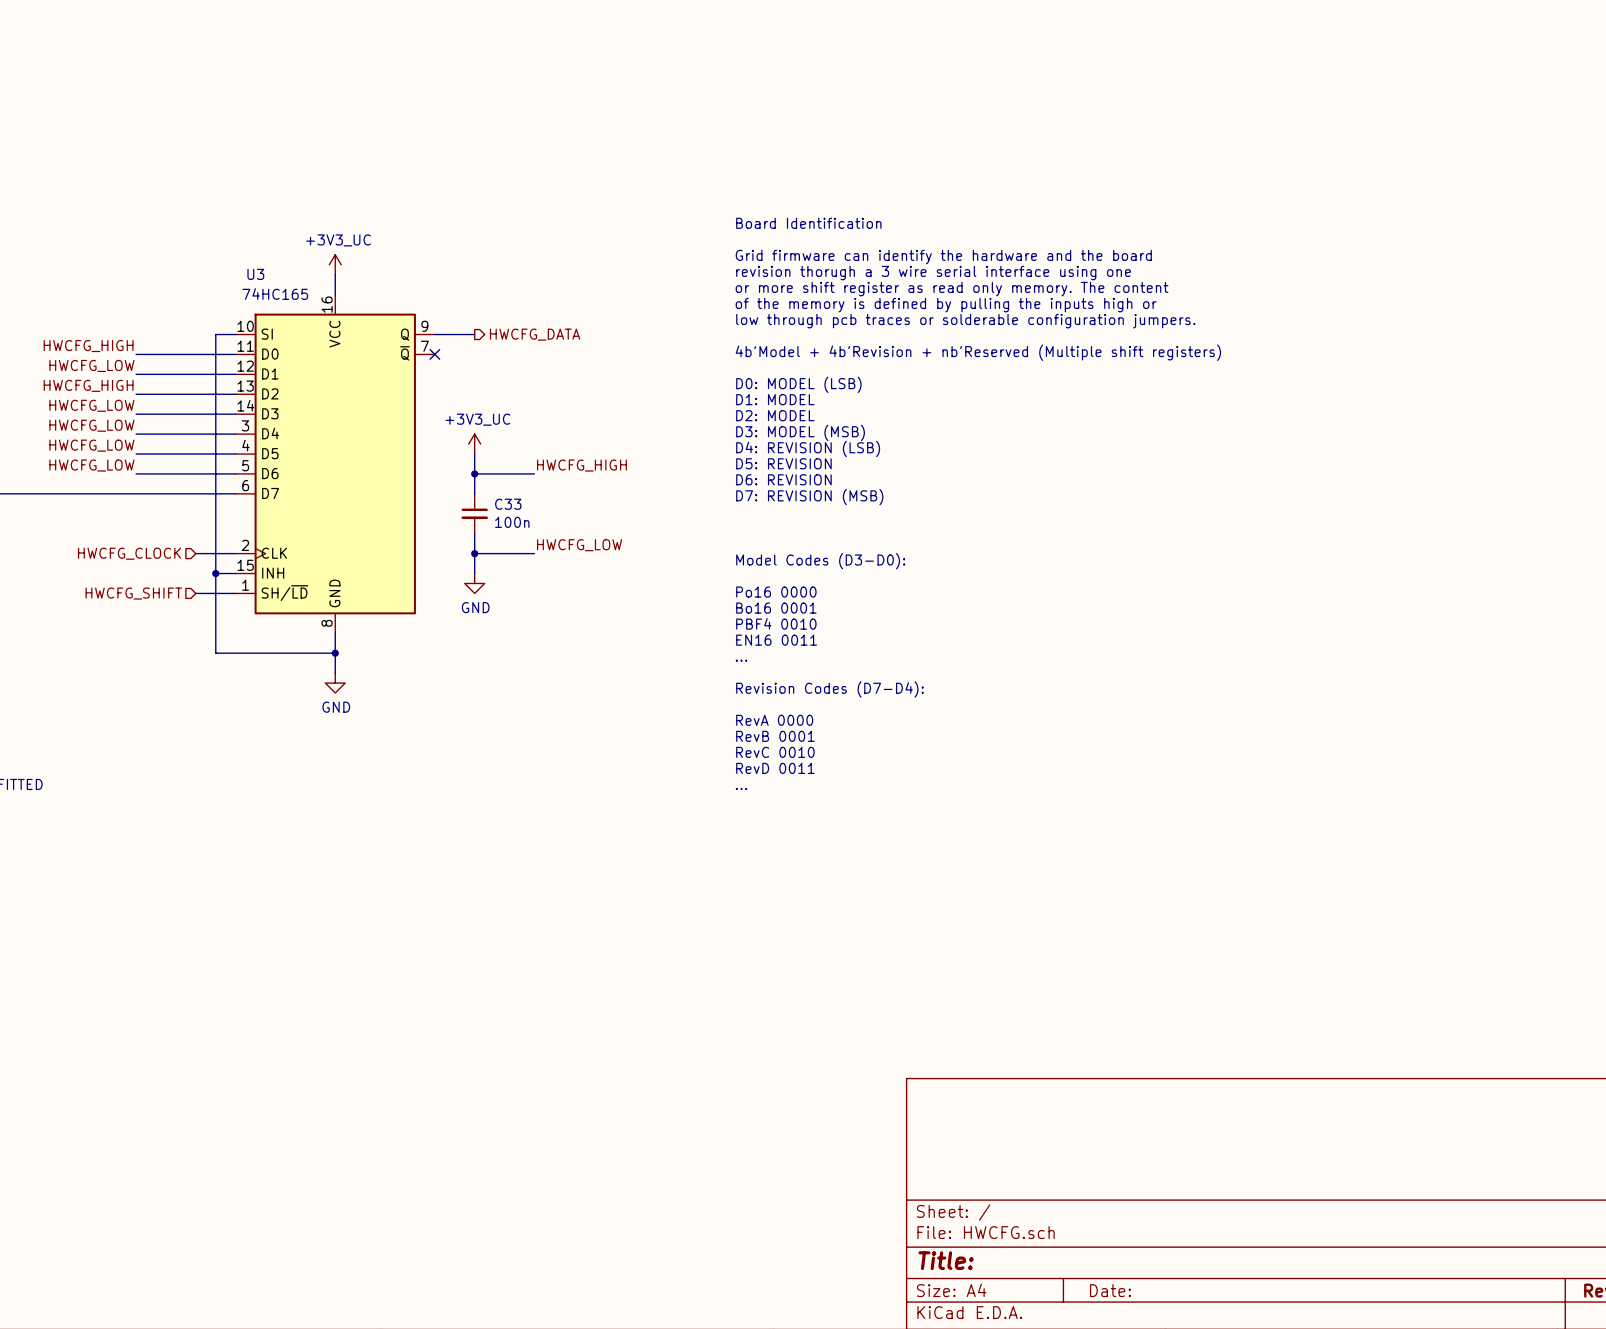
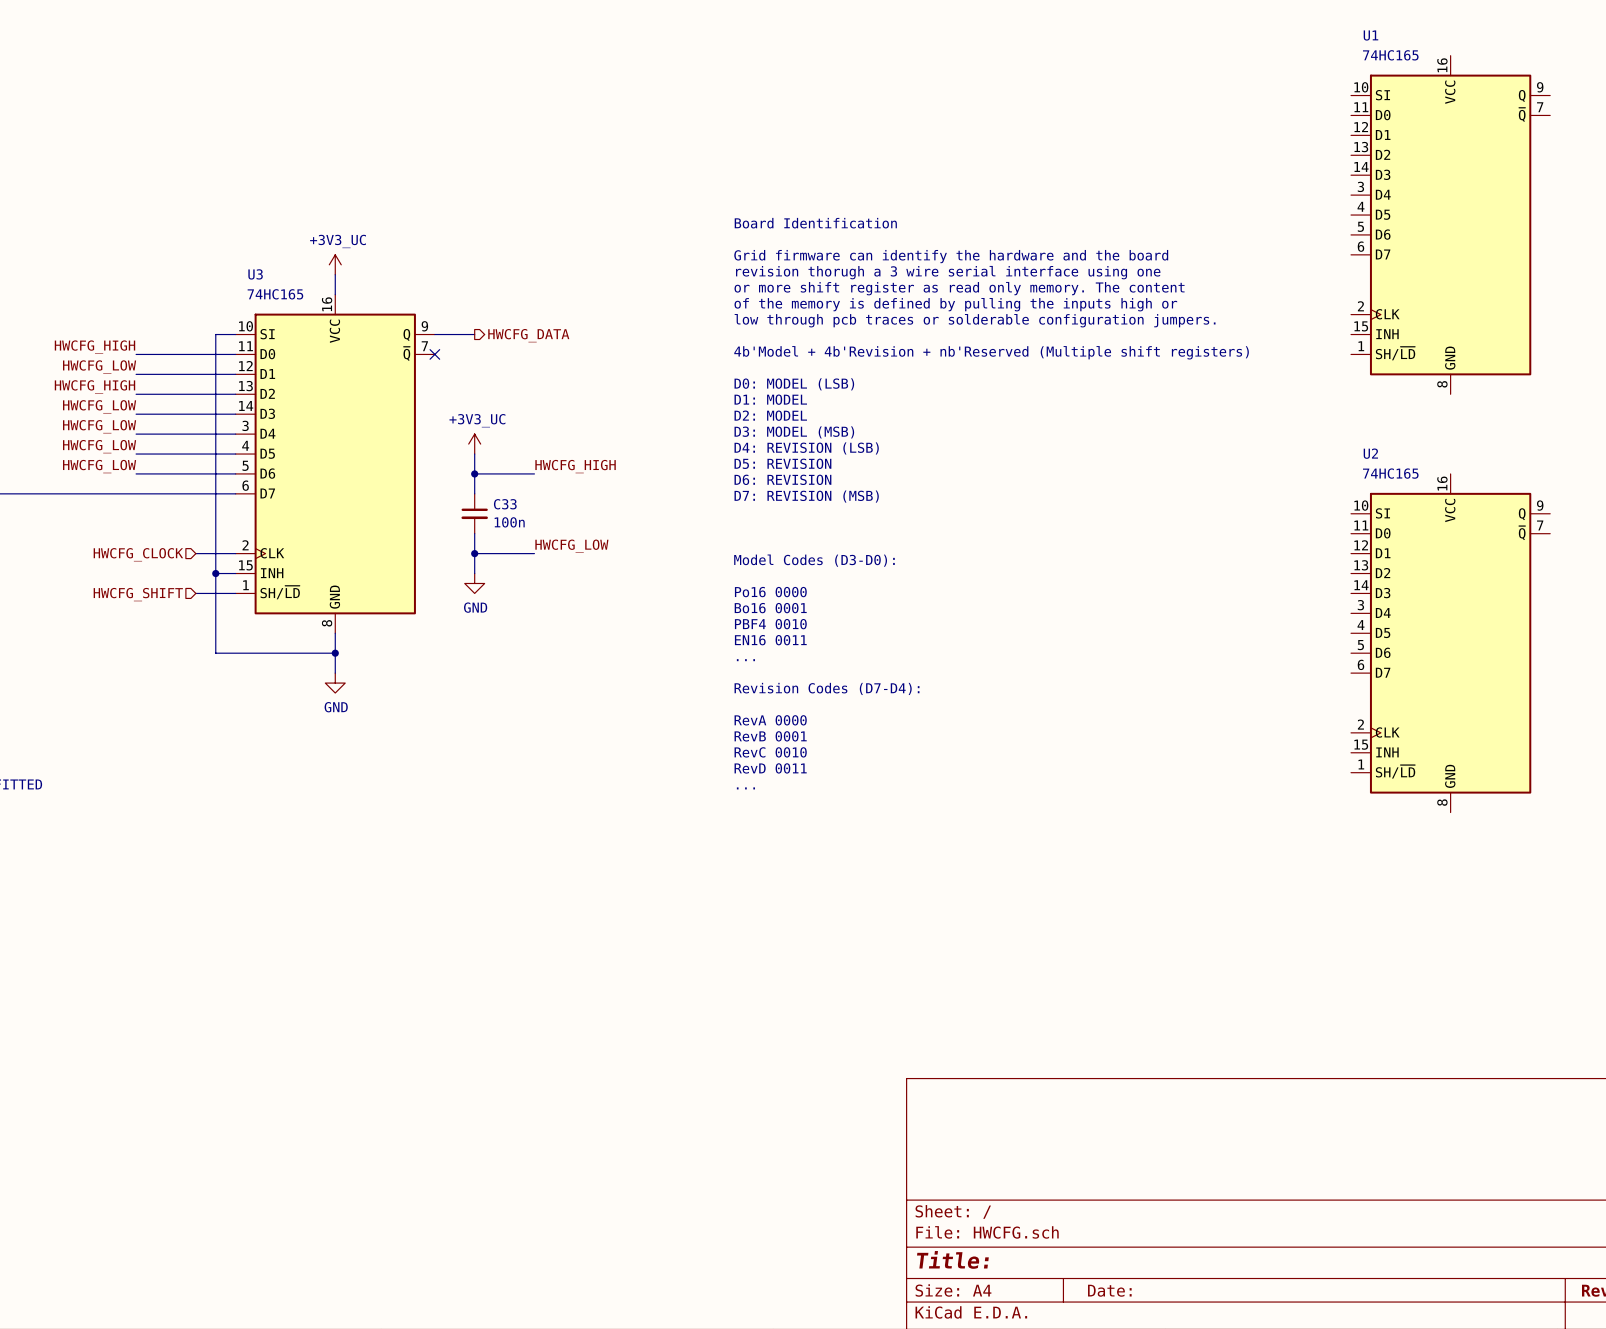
U1: none -> 74HC165 (1450, 224)
U2: none -> 74HC165 (1450, 643)

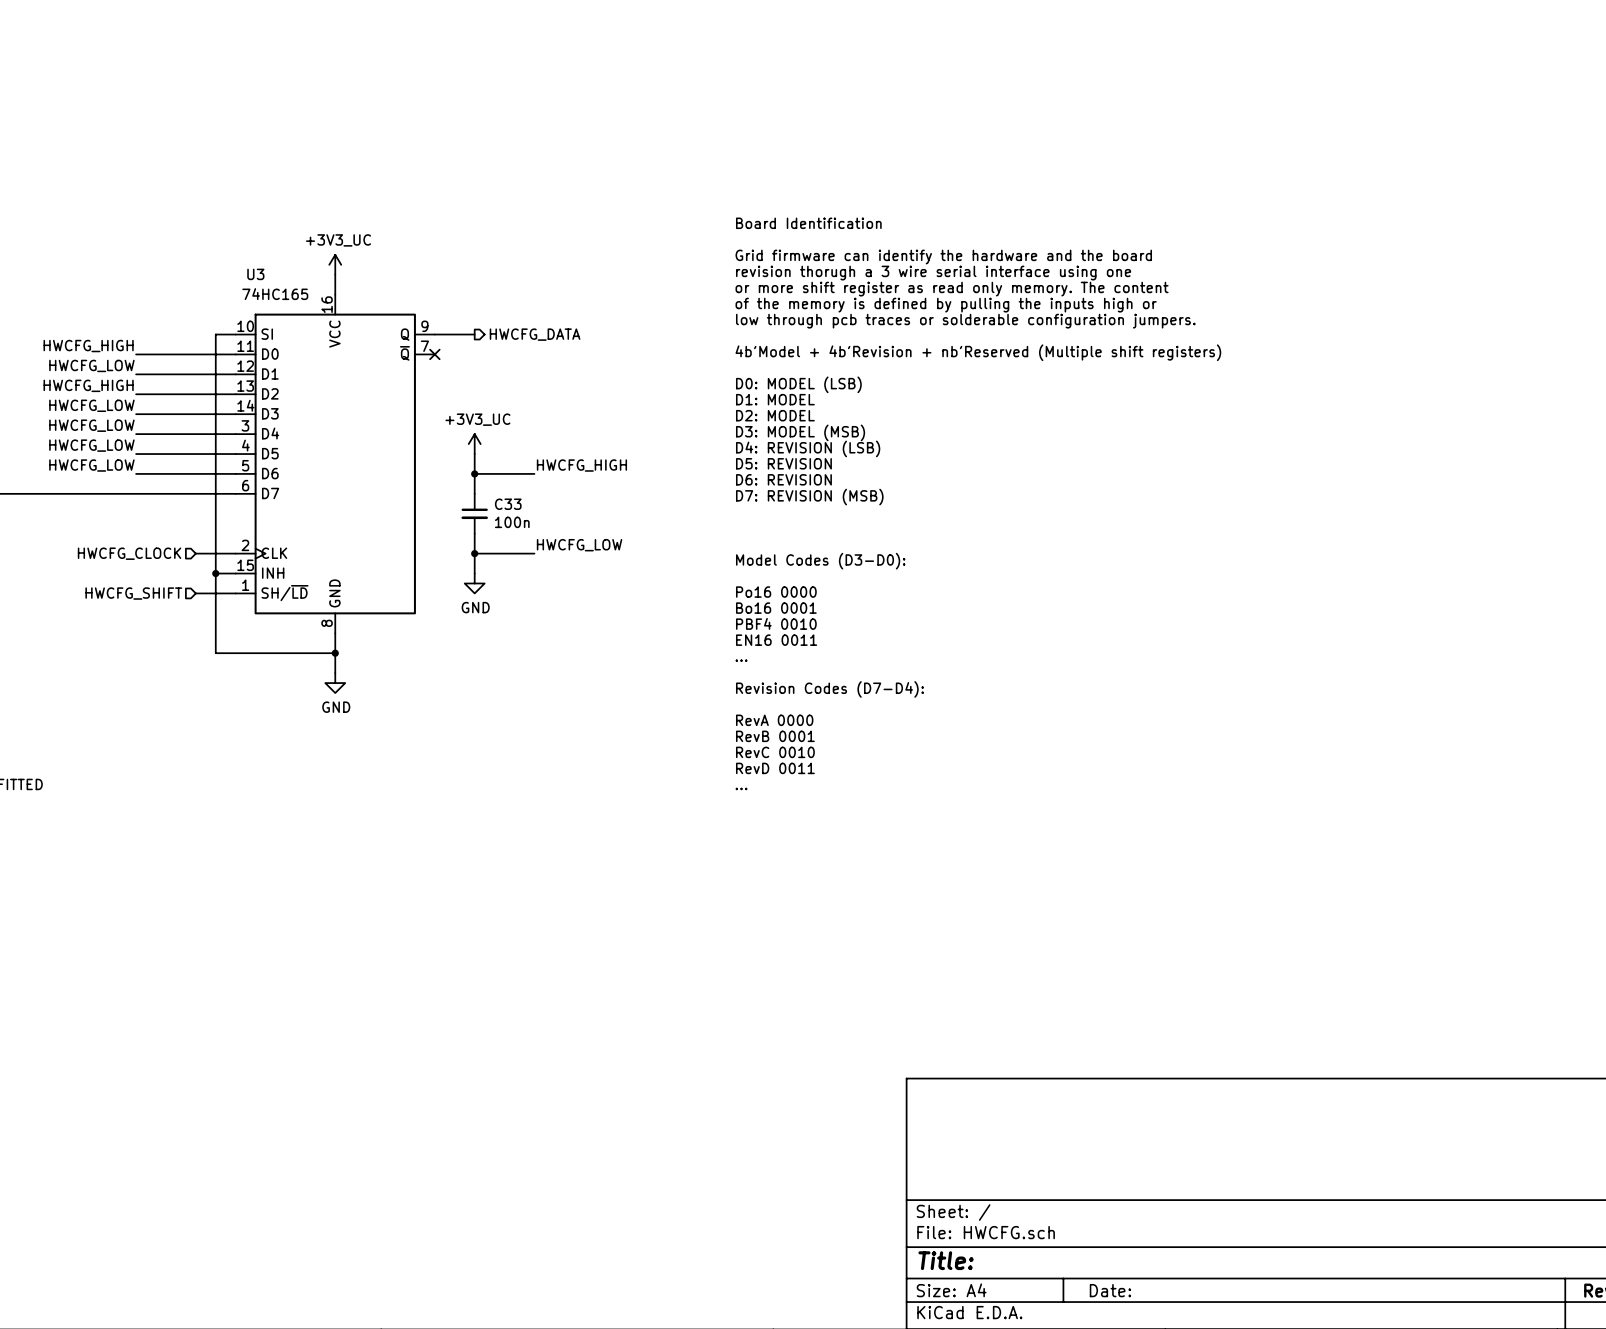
U1: 74HC165 (1450, 224) -> none
U2: 74HC165 (1450, 643) -> none

